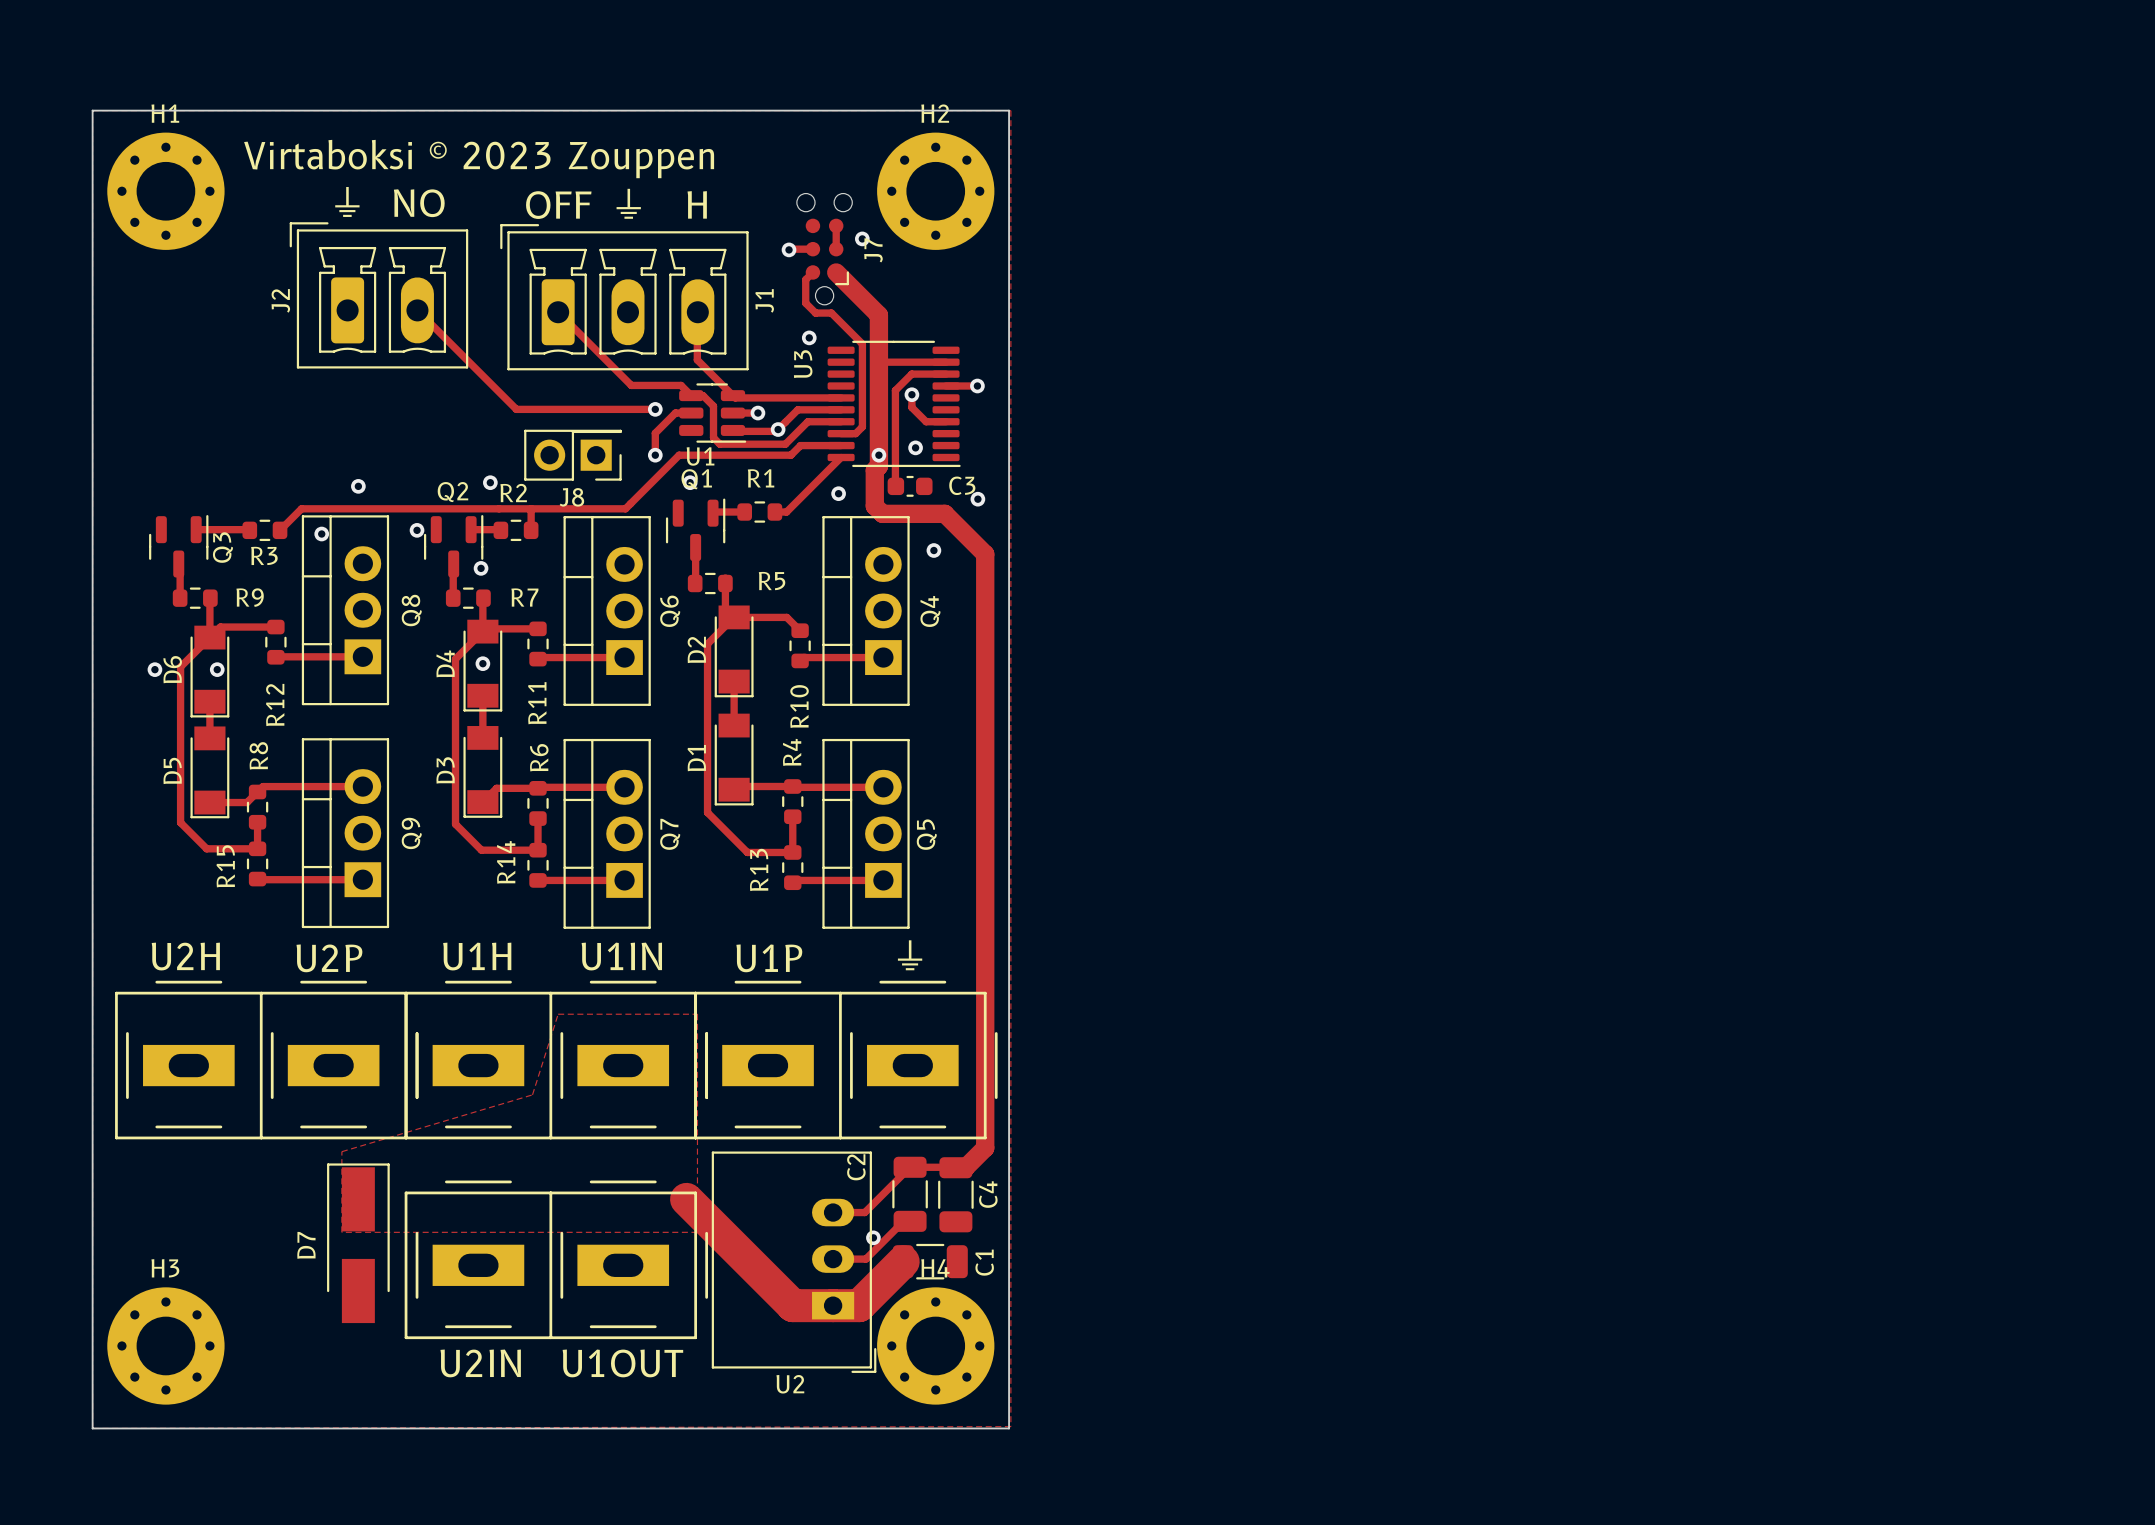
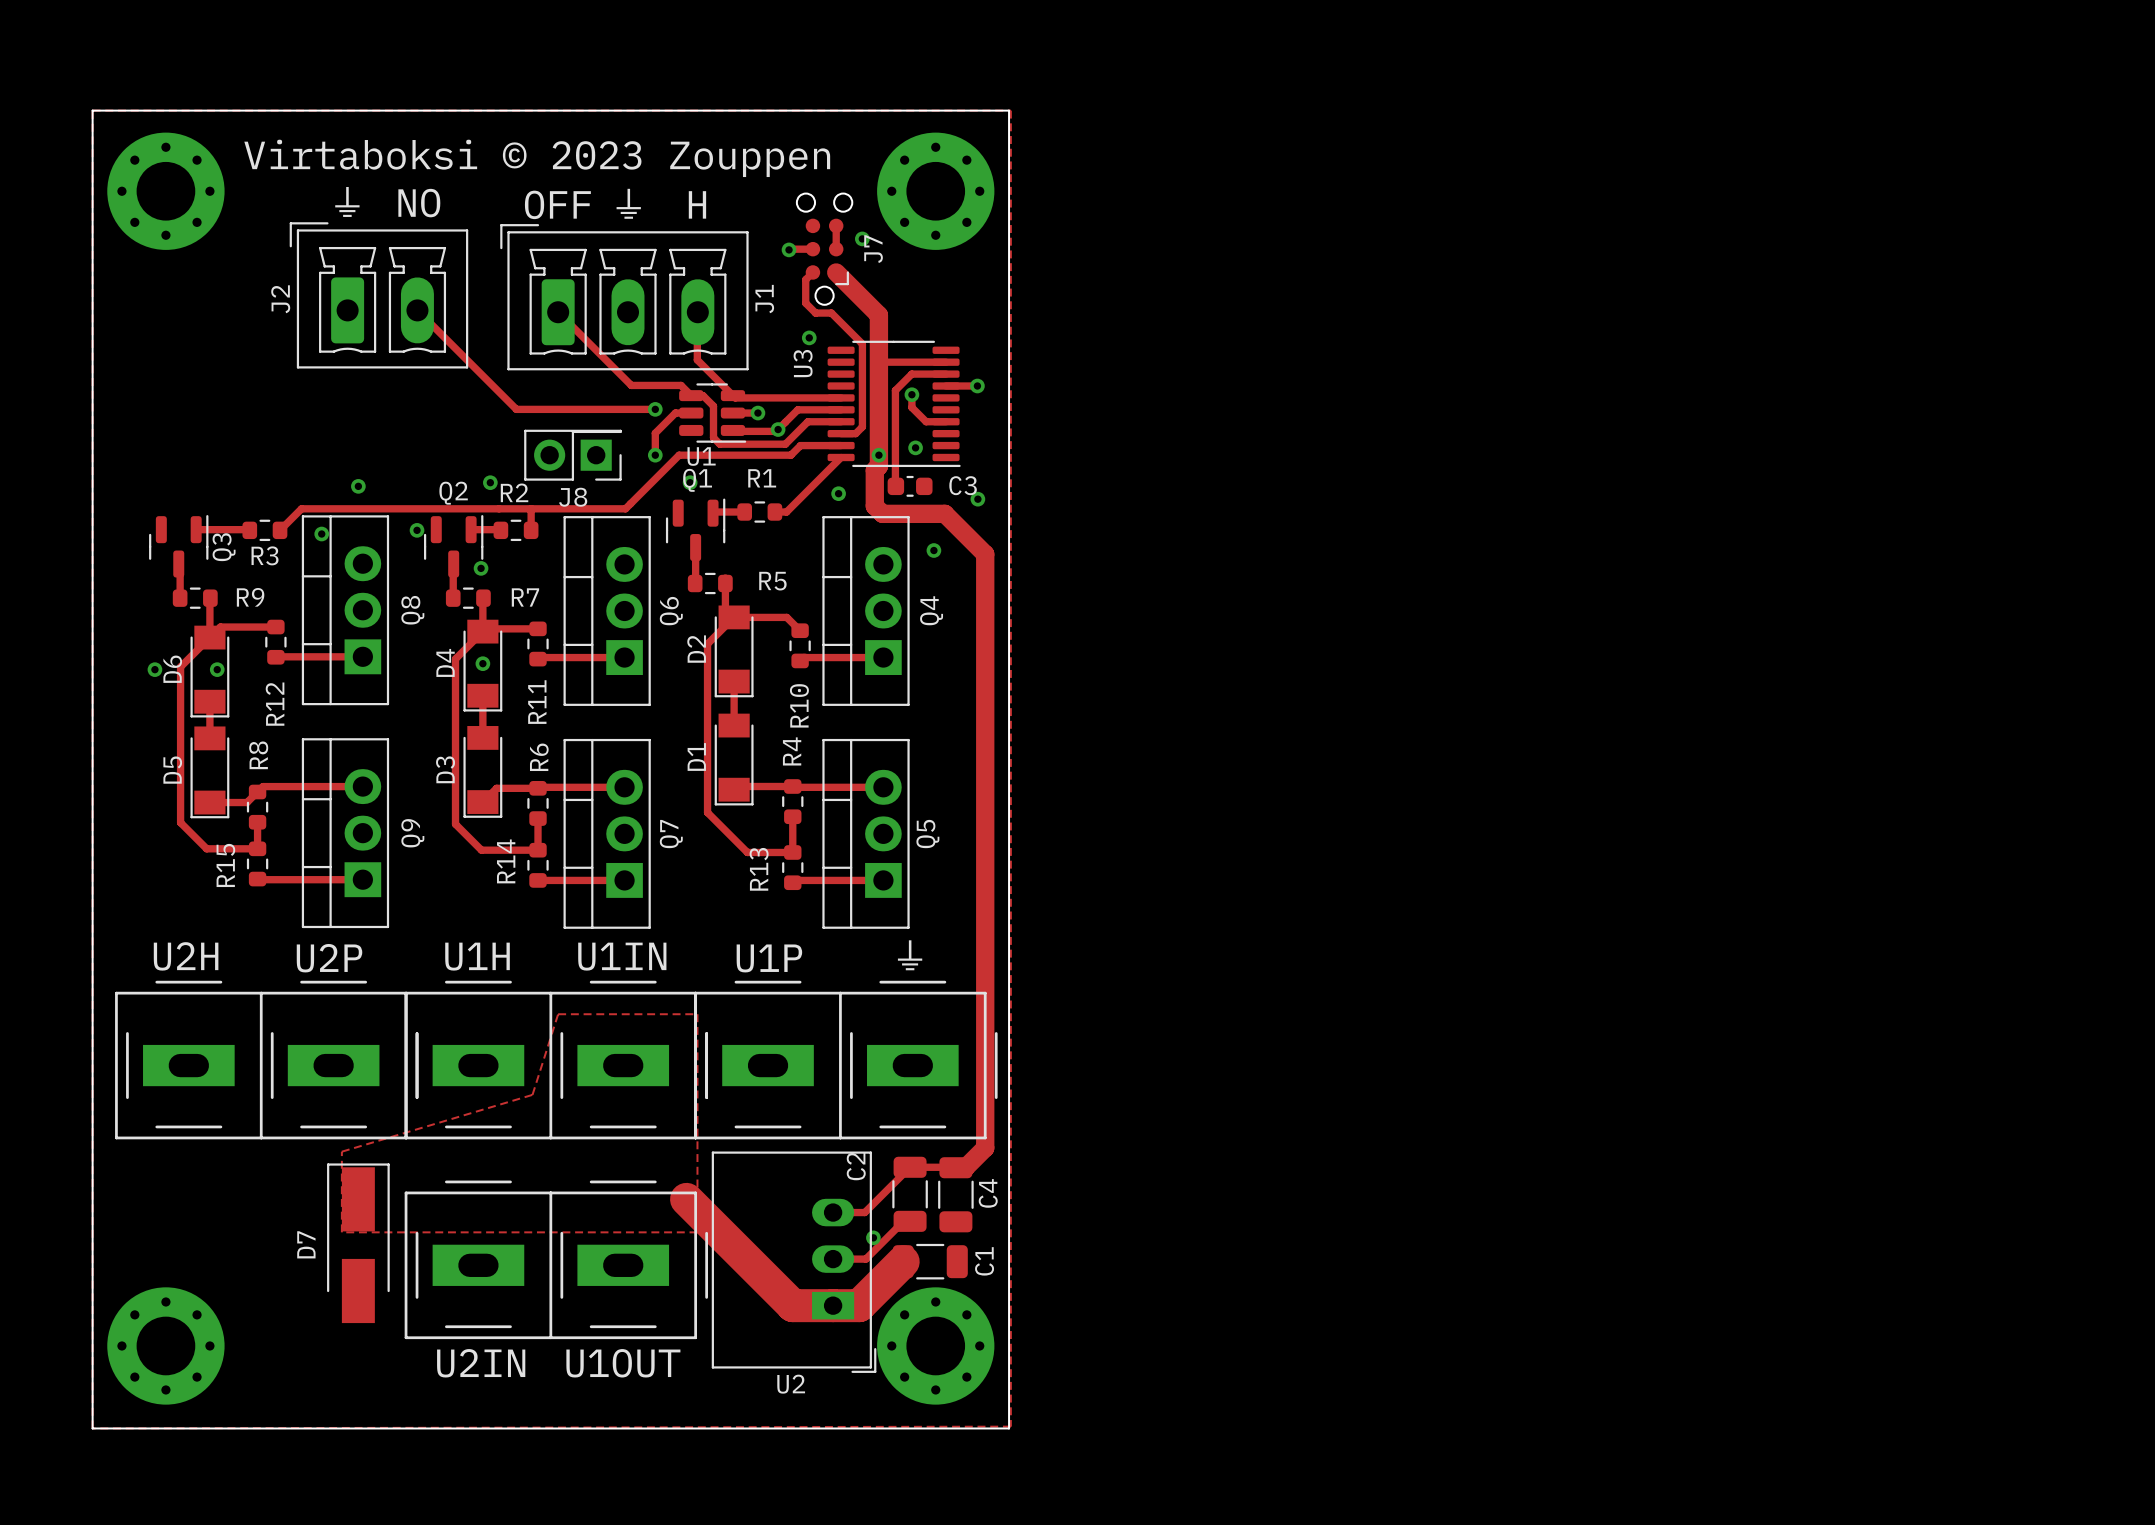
H1 name: H1 (165, 113) -> none
H2 name: H2 (935, 113) -> none
H3 name: H3 (165, 1268) -> none
H4 name: H4 (935, 1268) -> none

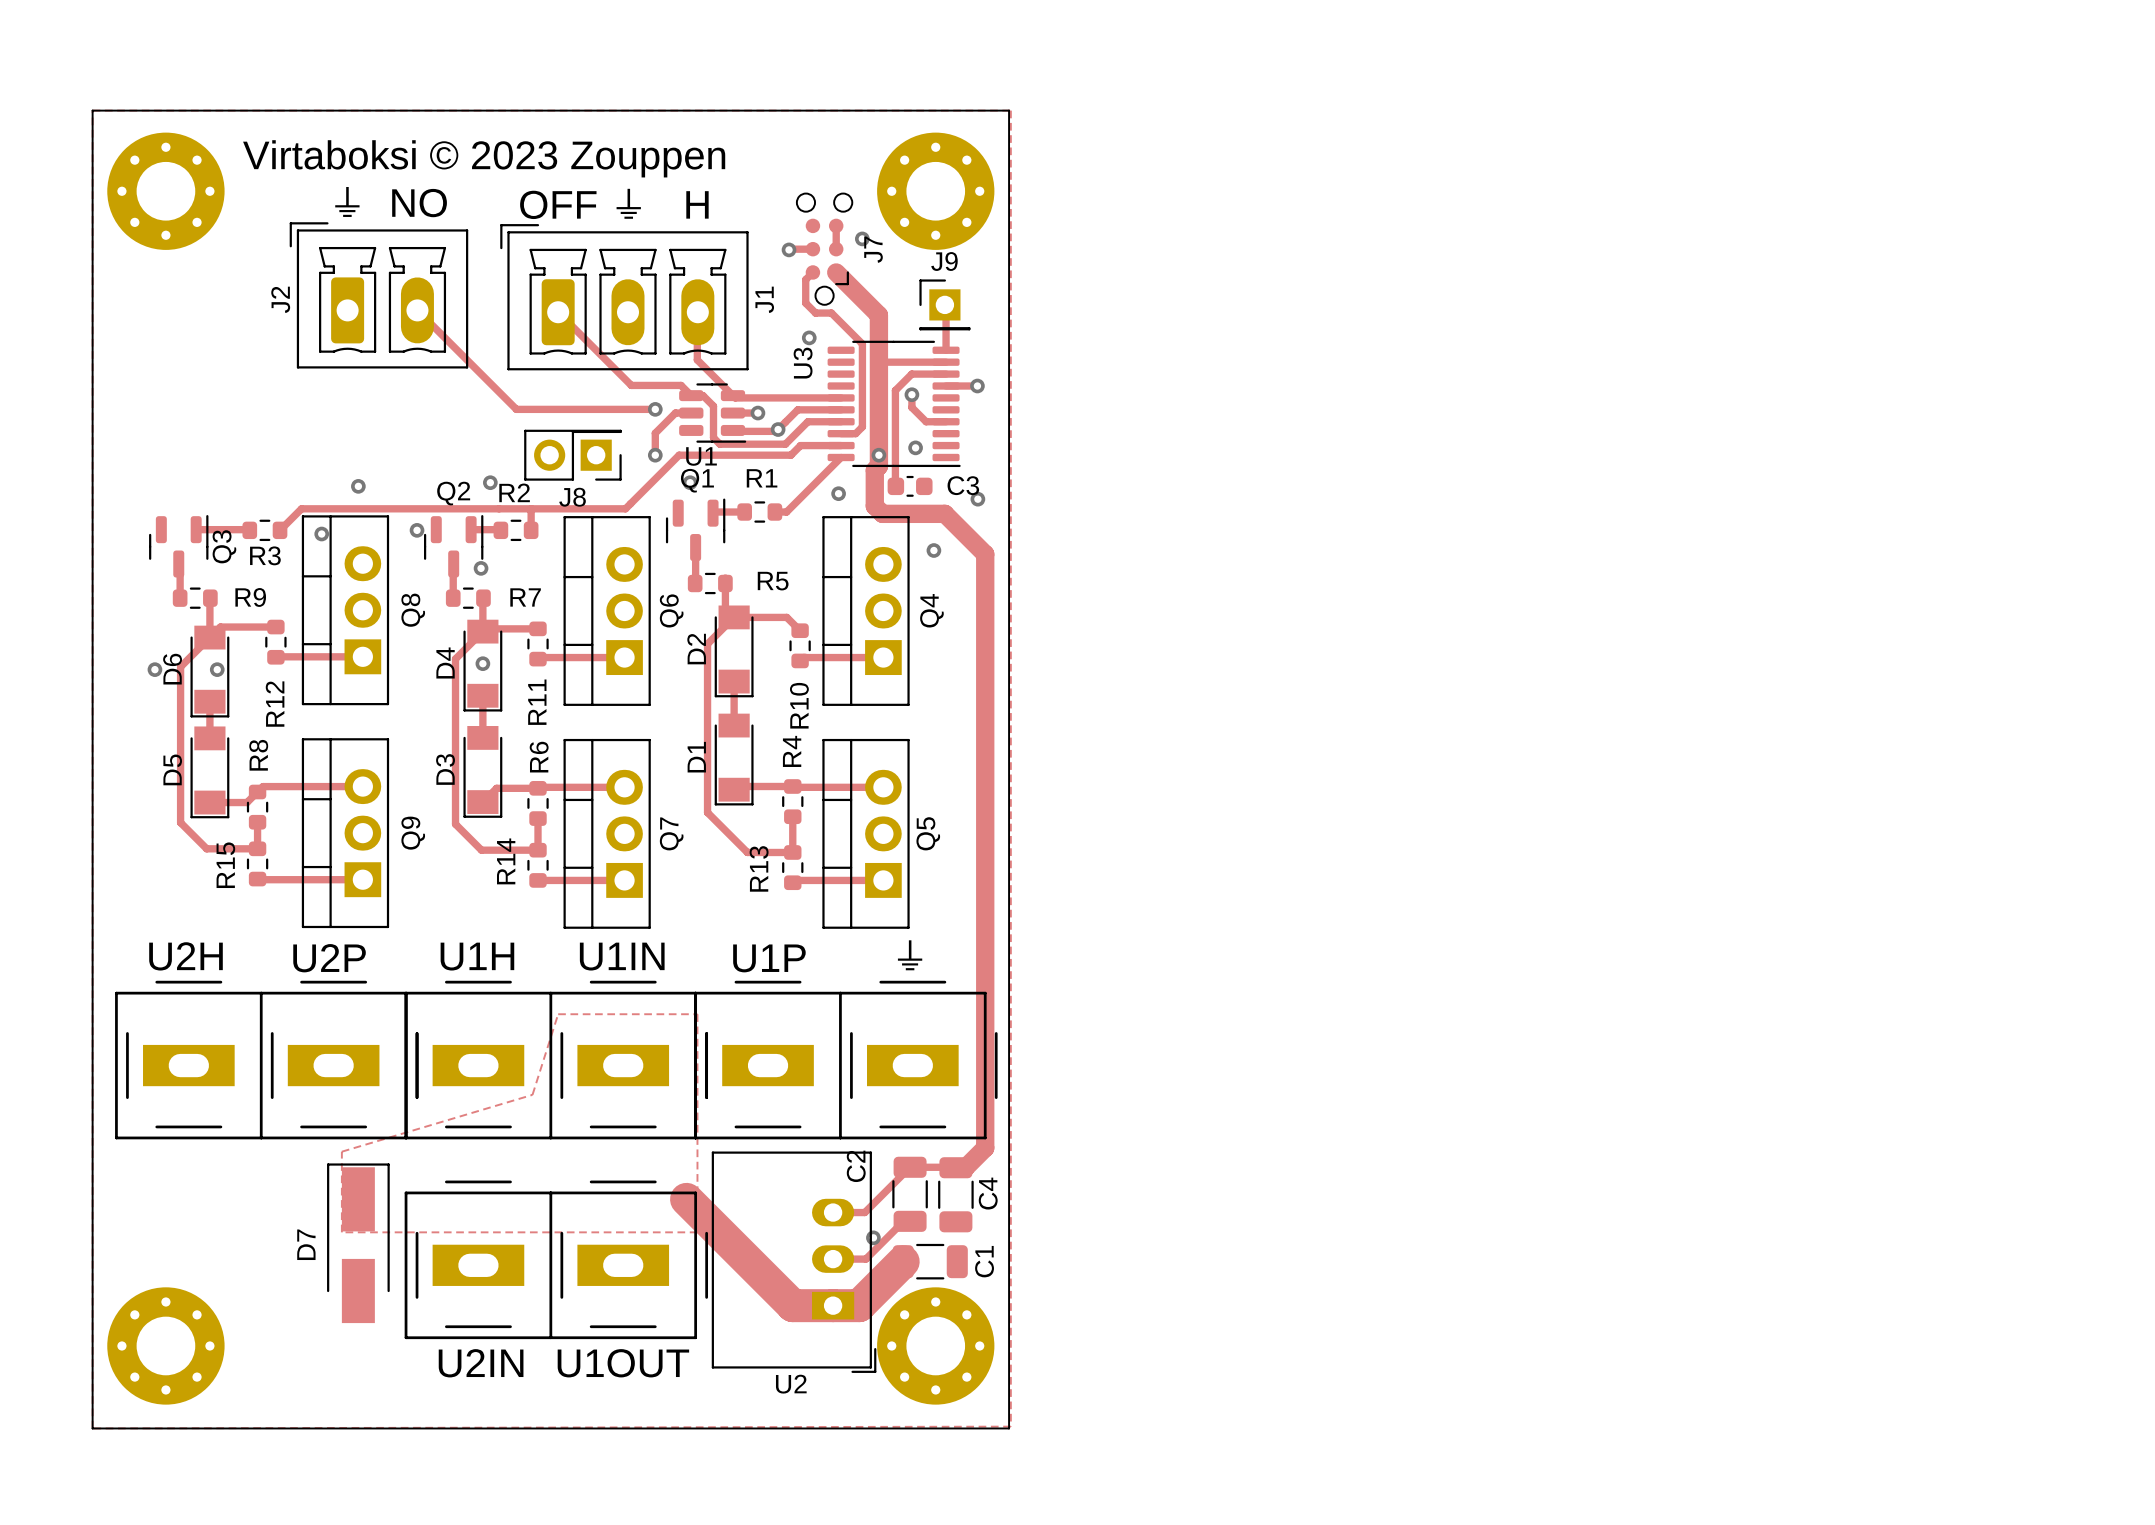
track: none -> (944, 304) (946, 350)
J9: none -> (944, 304)

